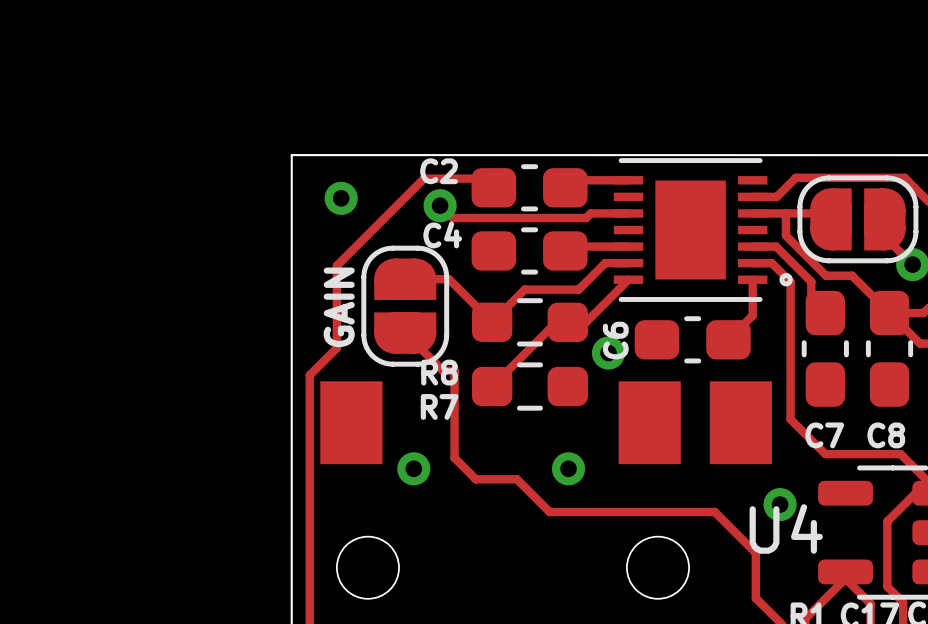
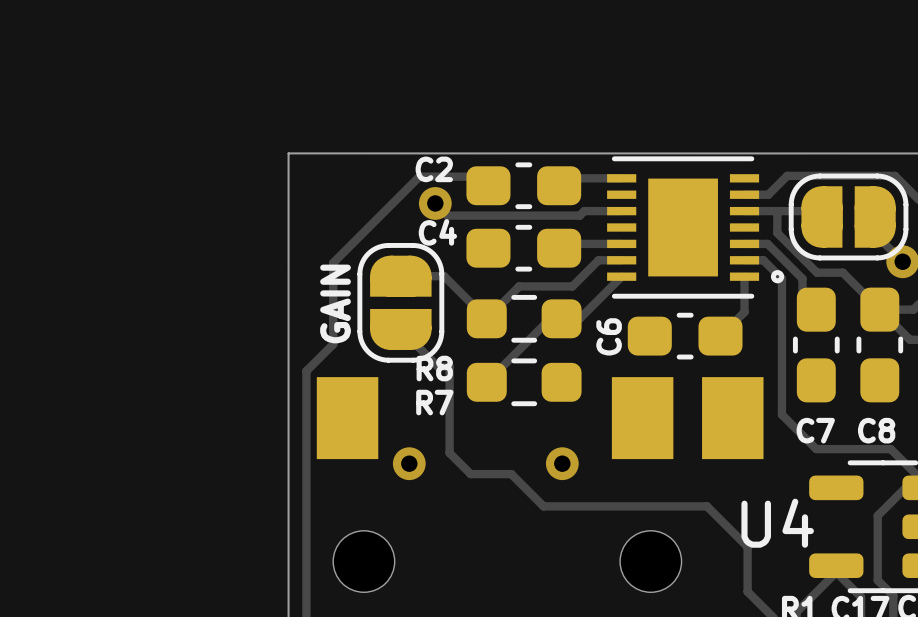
via: (341, 198) -> none
via: (608, 353) -> none
via: (780, 504) -> none

